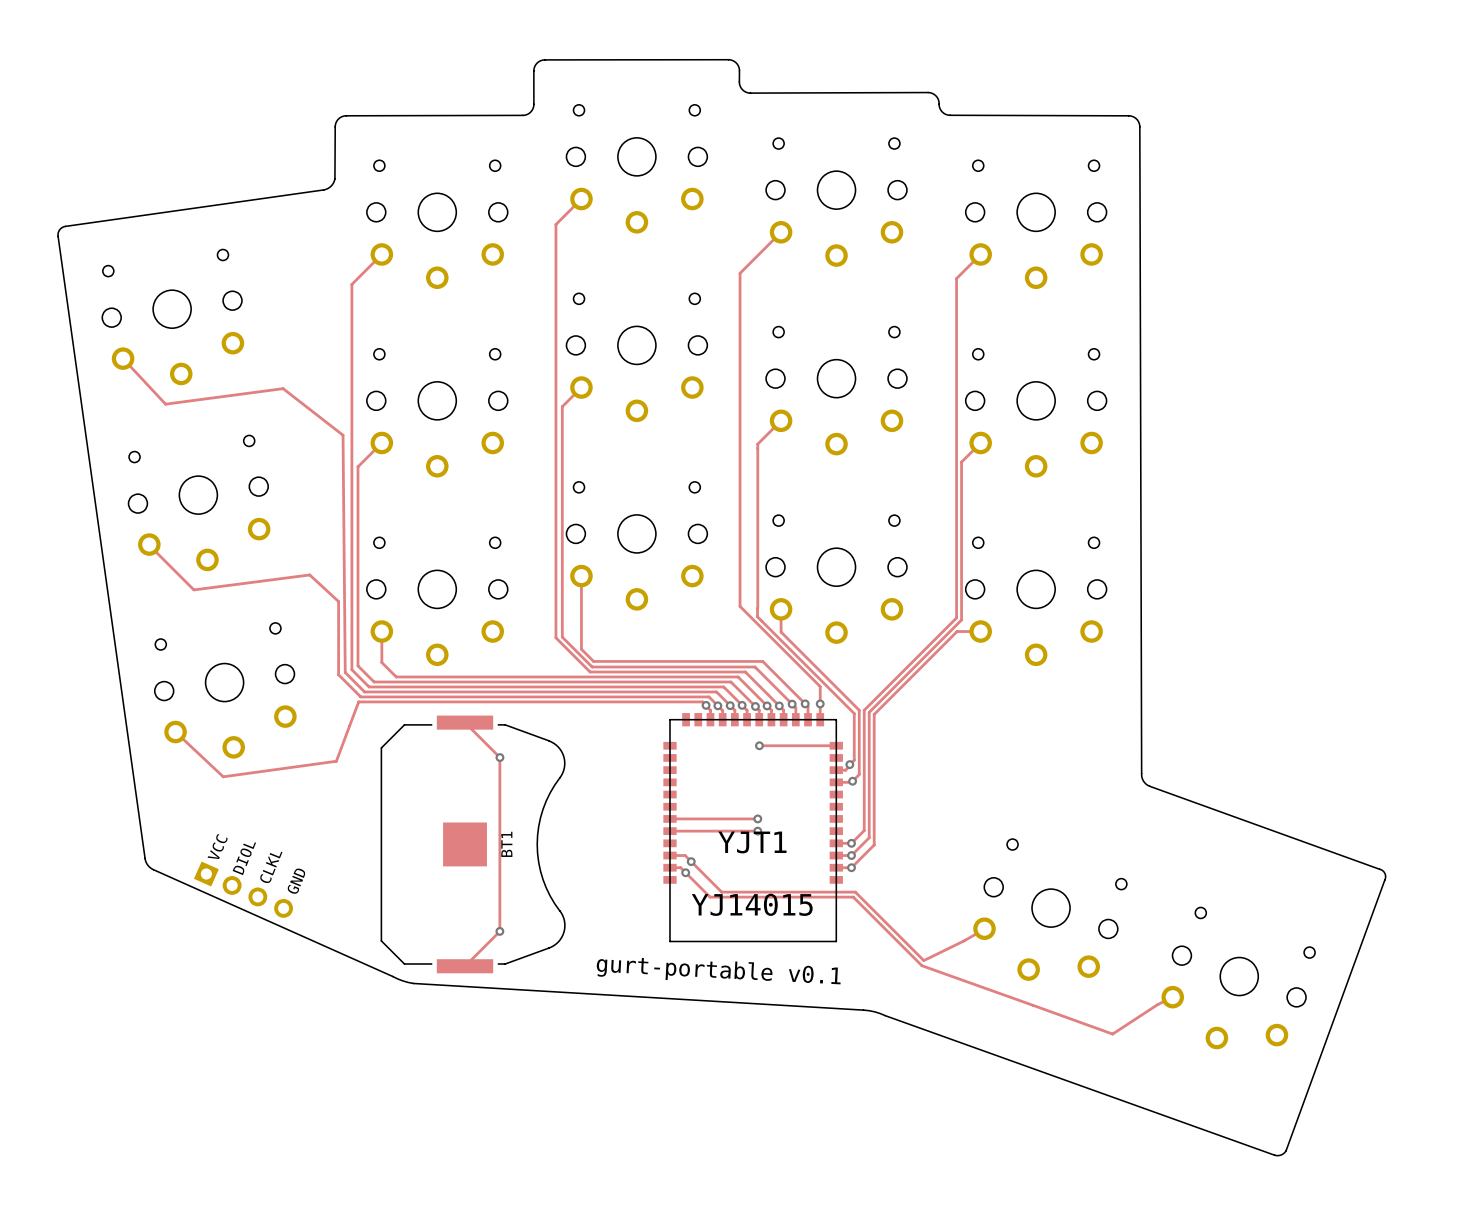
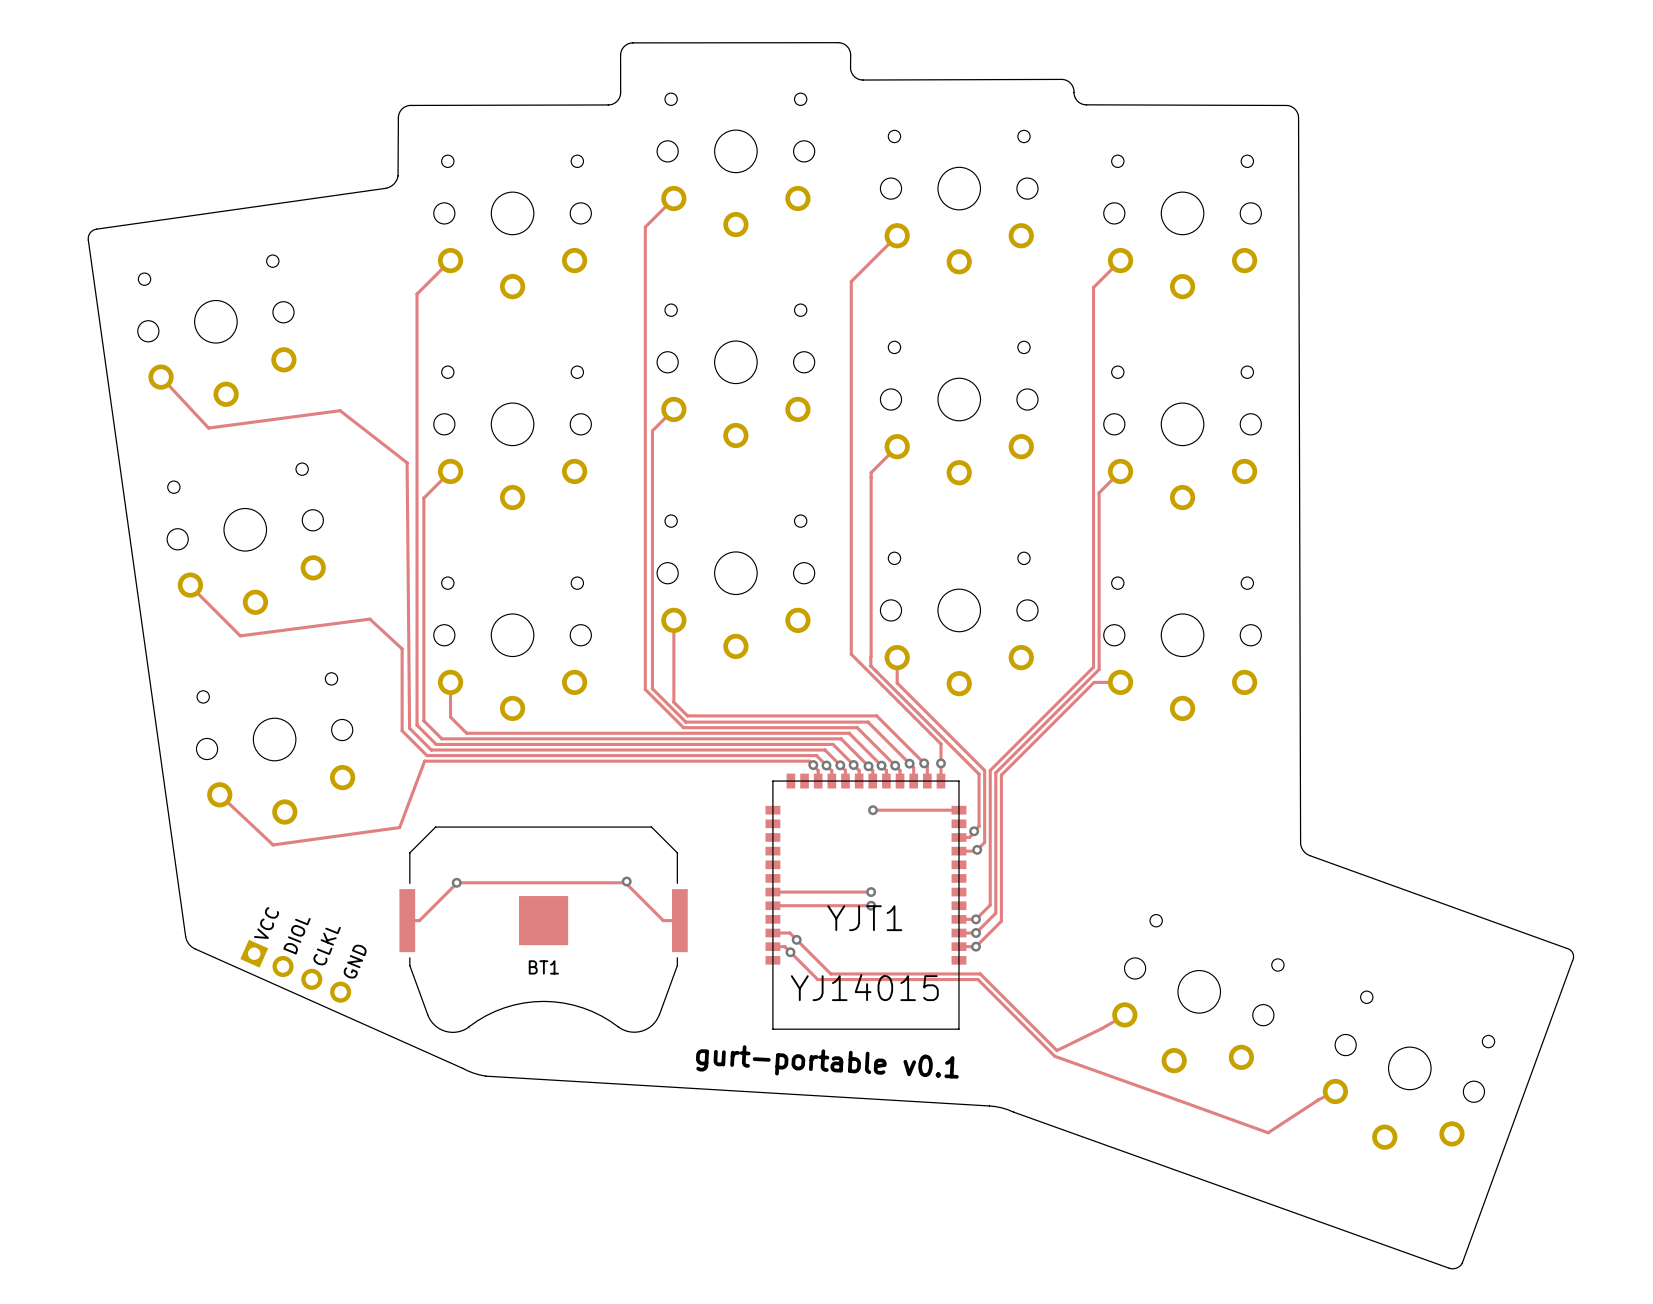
track: (465, 722) (499, 757) -> none
track: (499, 757) (499, 931) (465, 966) -> none
via: (499, 757) -> none
via: none -> (626, 881)
via: none -> (456, 882)
track: none -> (407, 920) (419, 920) (456, 882) (626, 881) (626, 884) (663, 920) (679, 920)
BT1 rotation: 0° (473, 844) -> 90° clockwise (543, 929)
via: (499, 931) -> none

